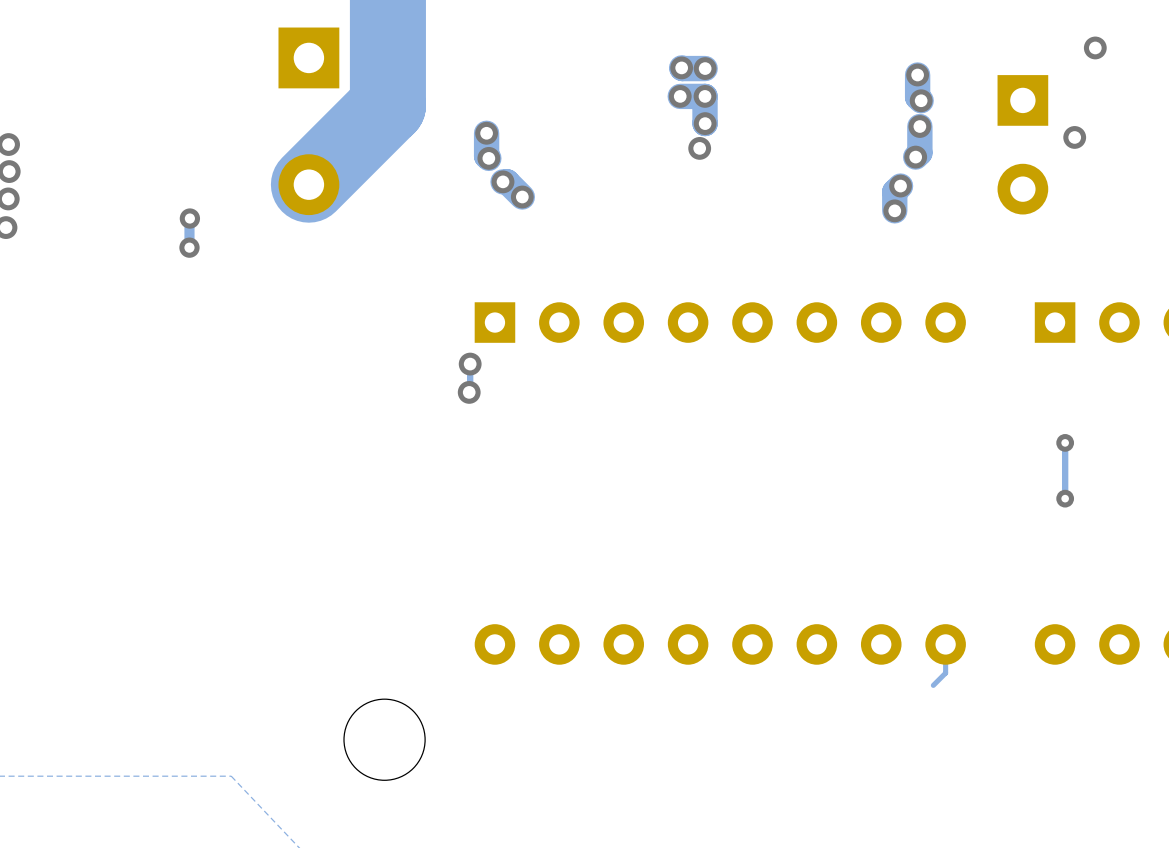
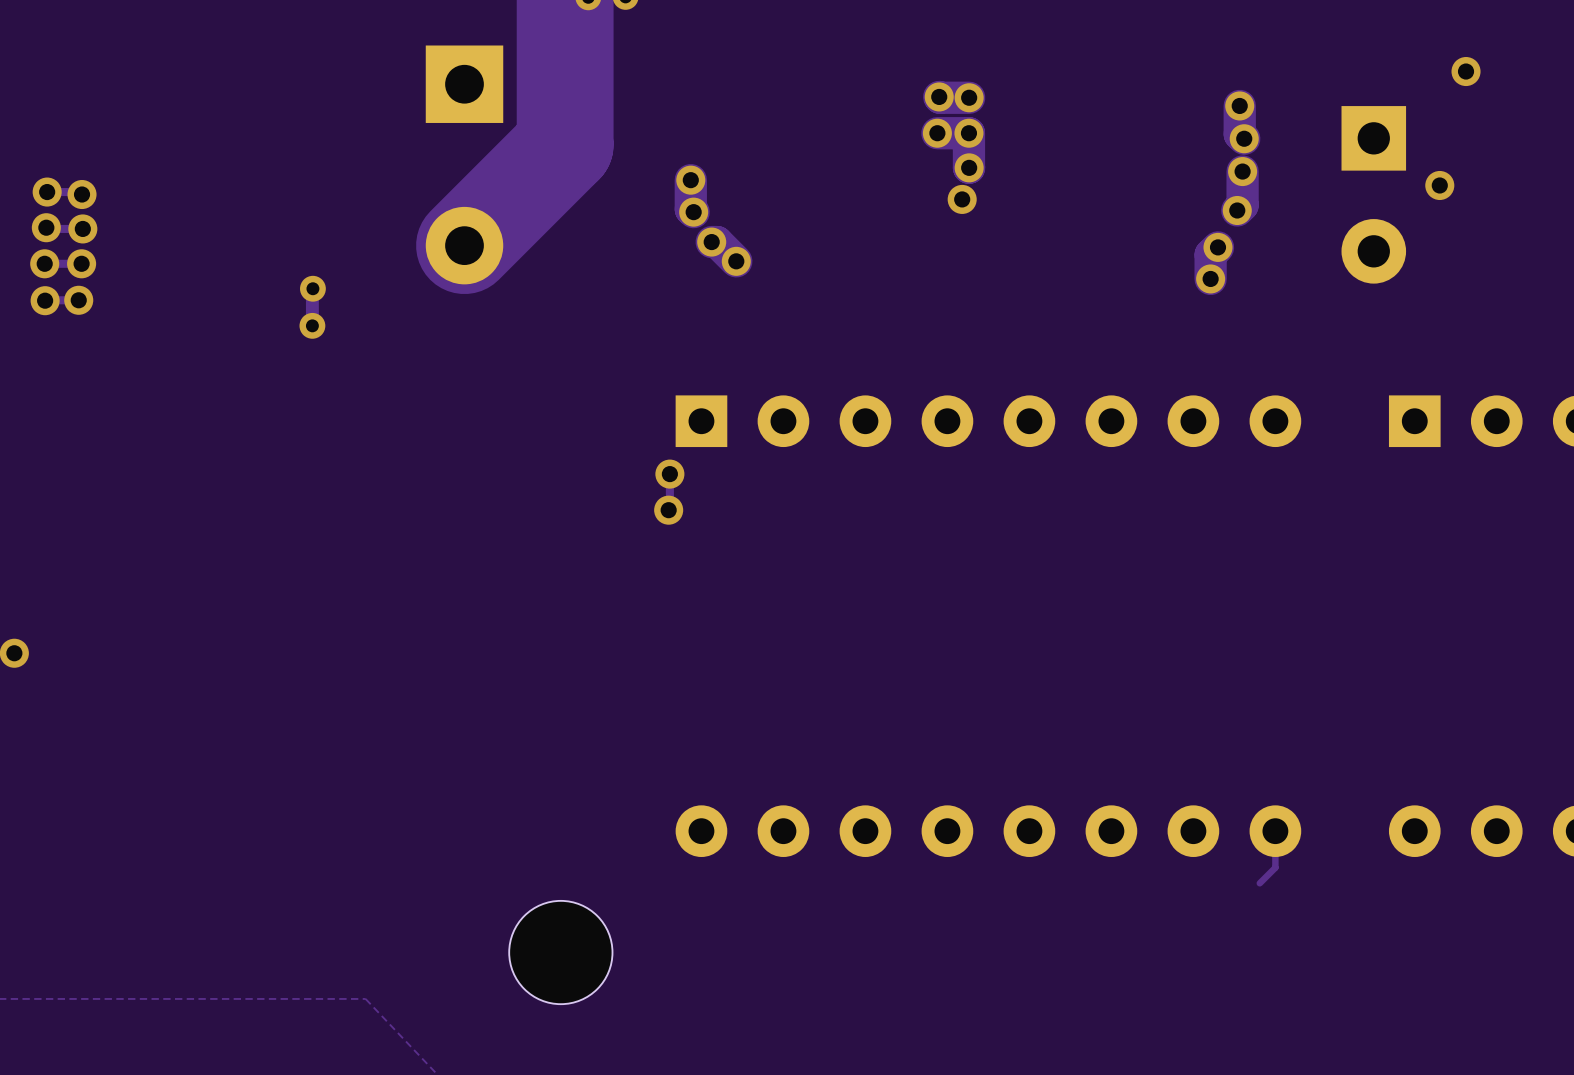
track: (1065, 442) (1065, 498) -> none
via: (1065, 442) -> none
via: (1065, 498) -> none

